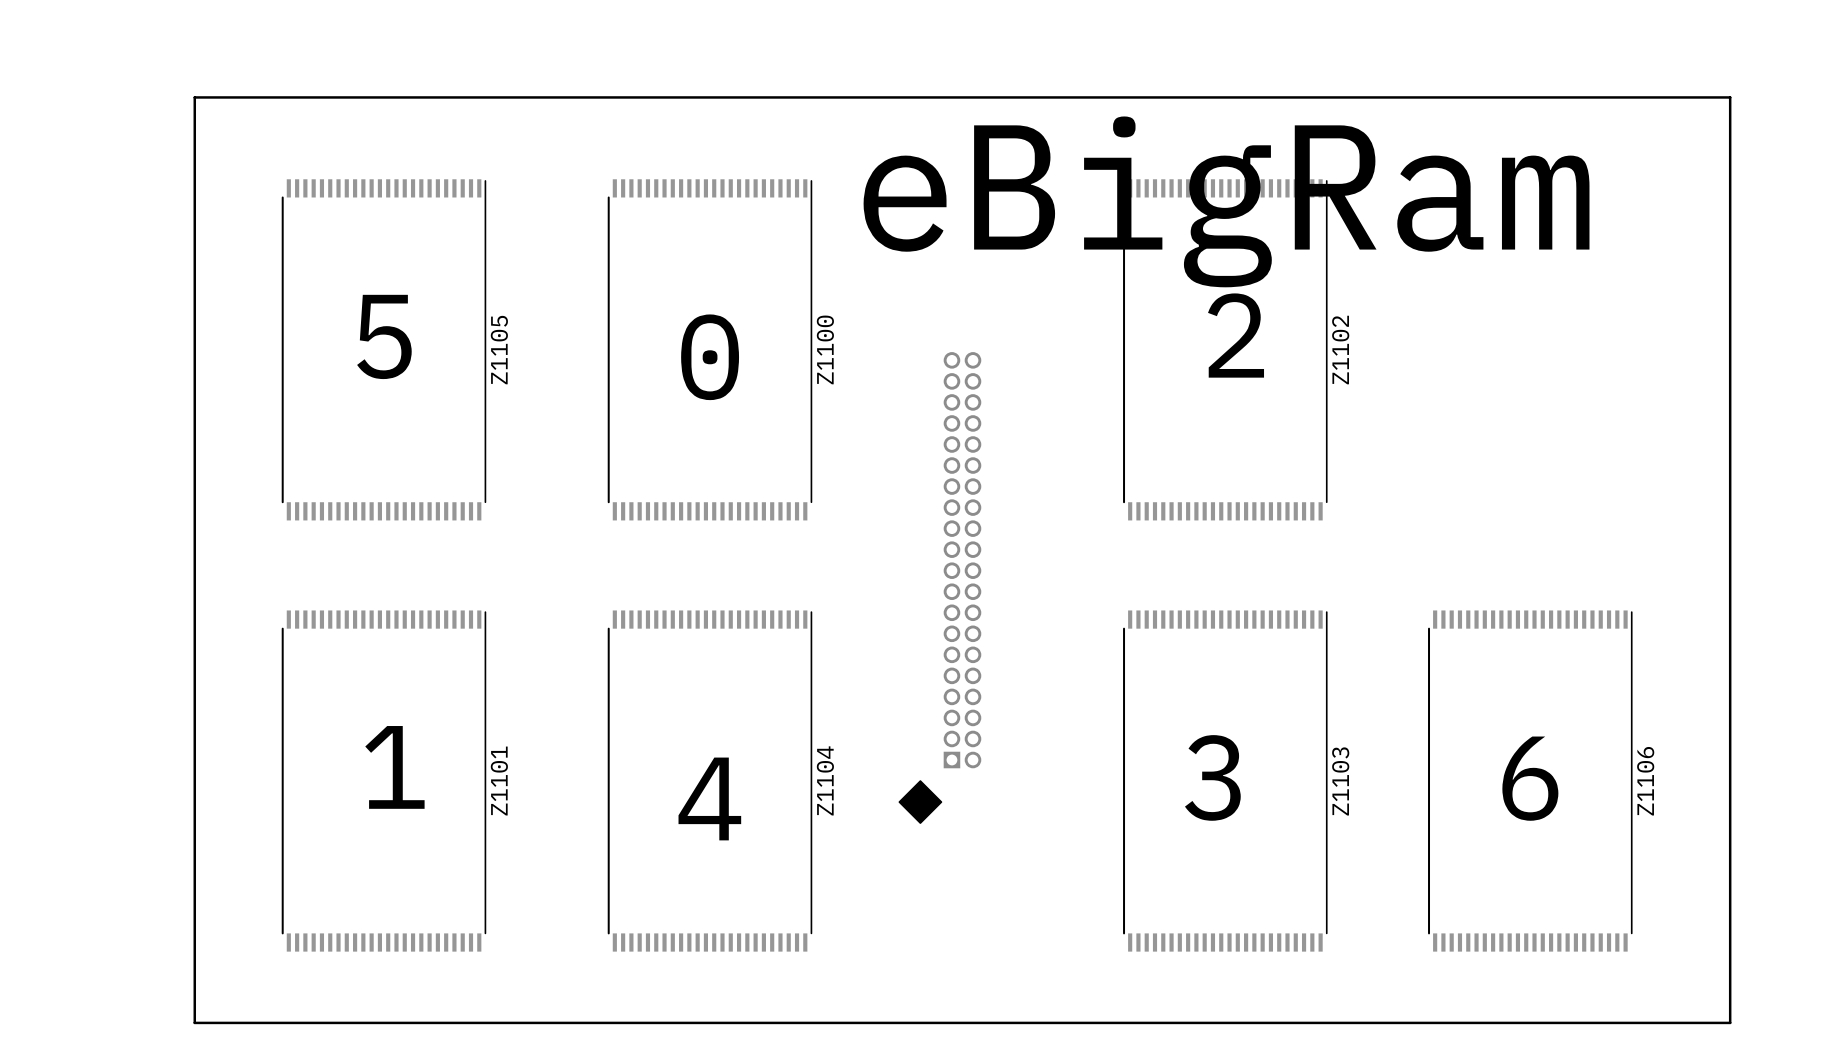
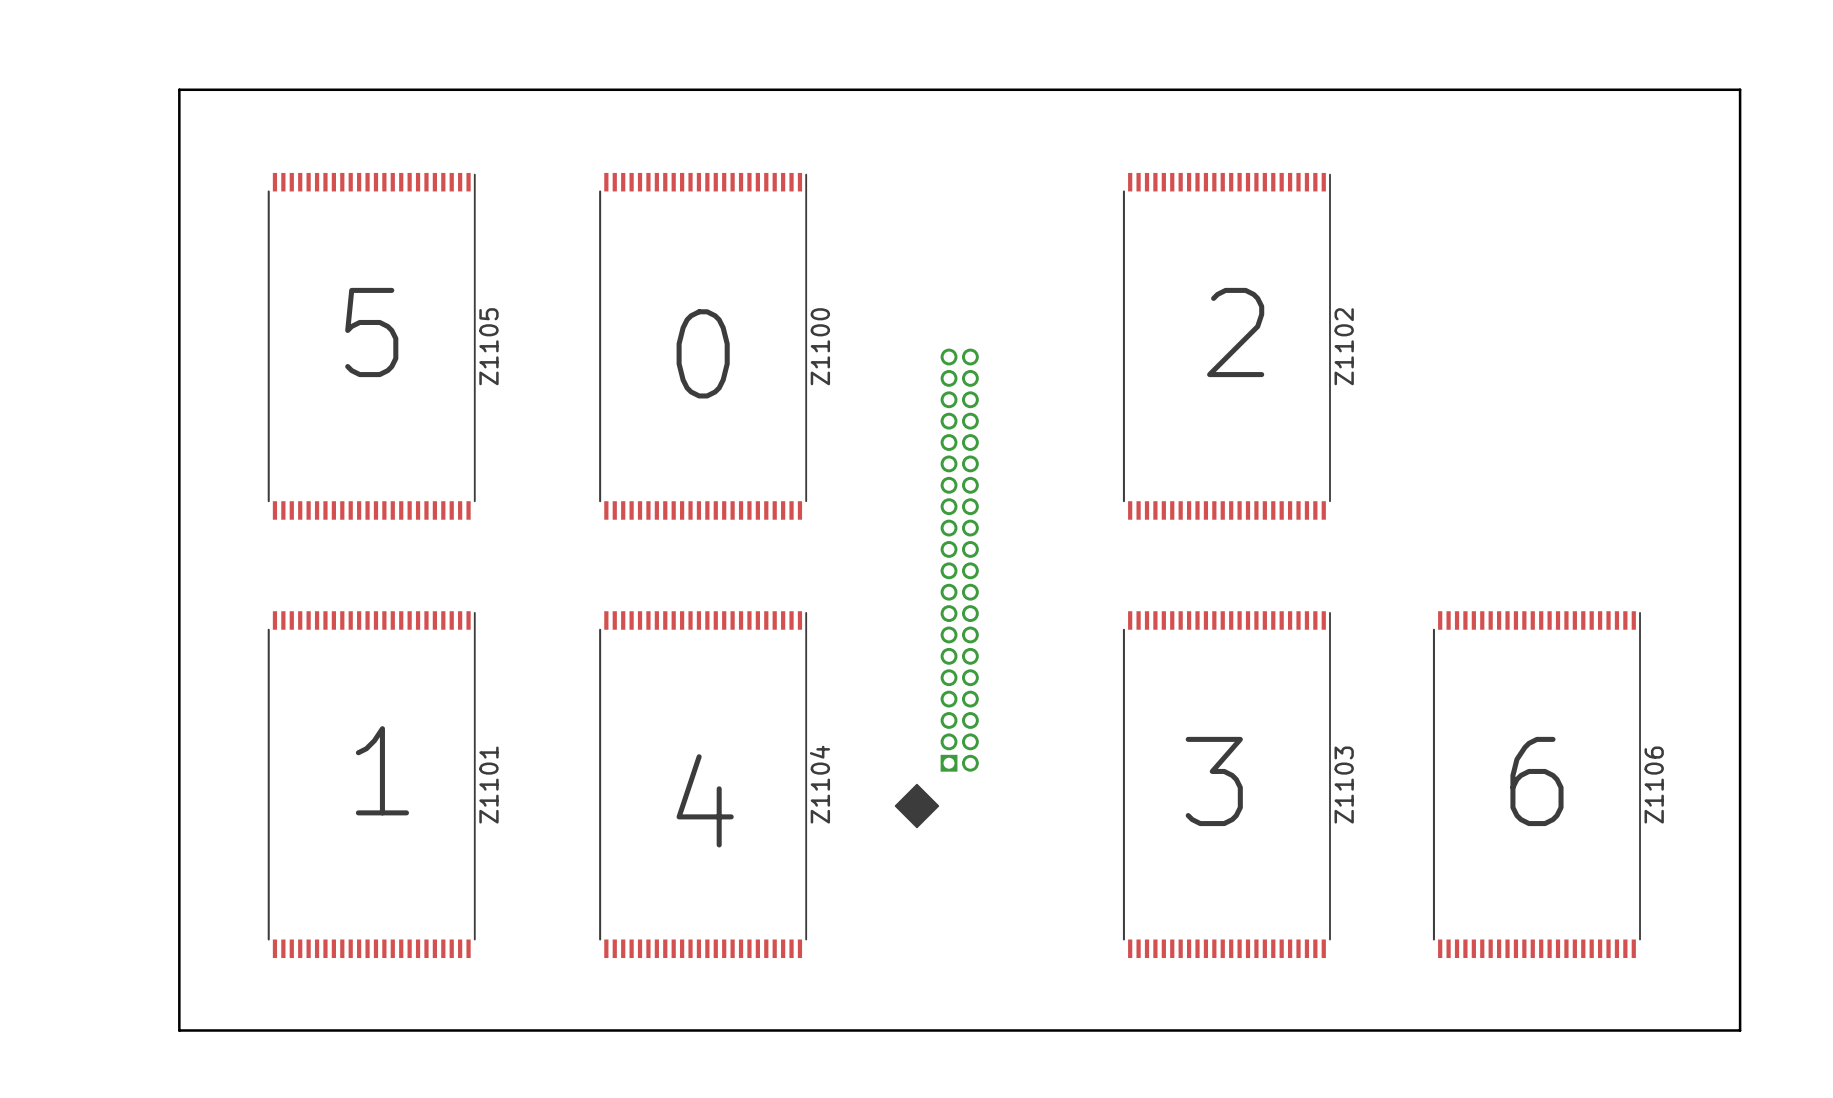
text: eBigRam (1226, 201) -> none

